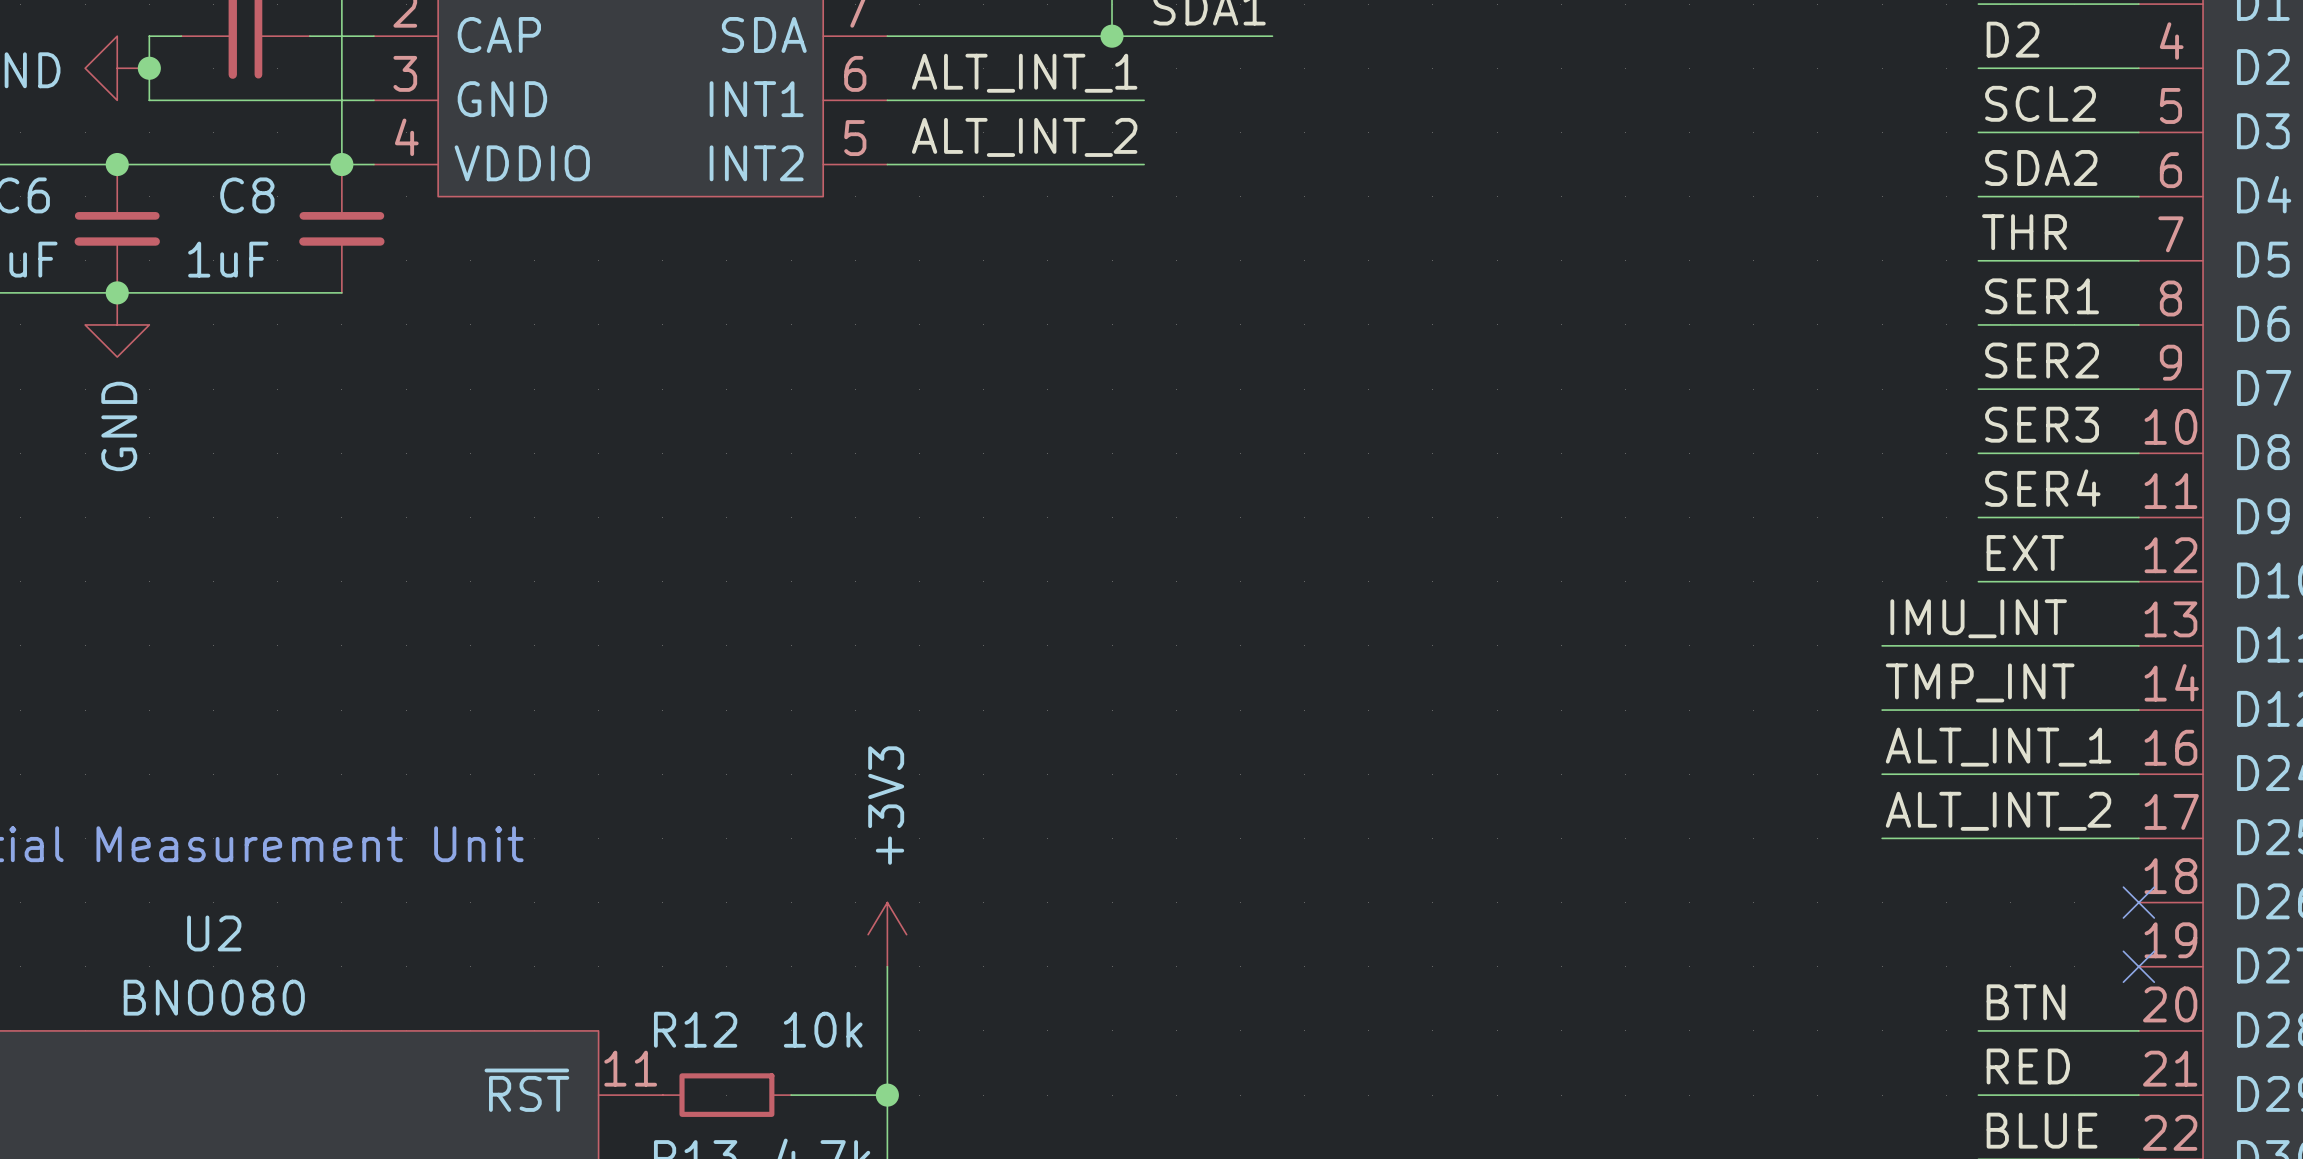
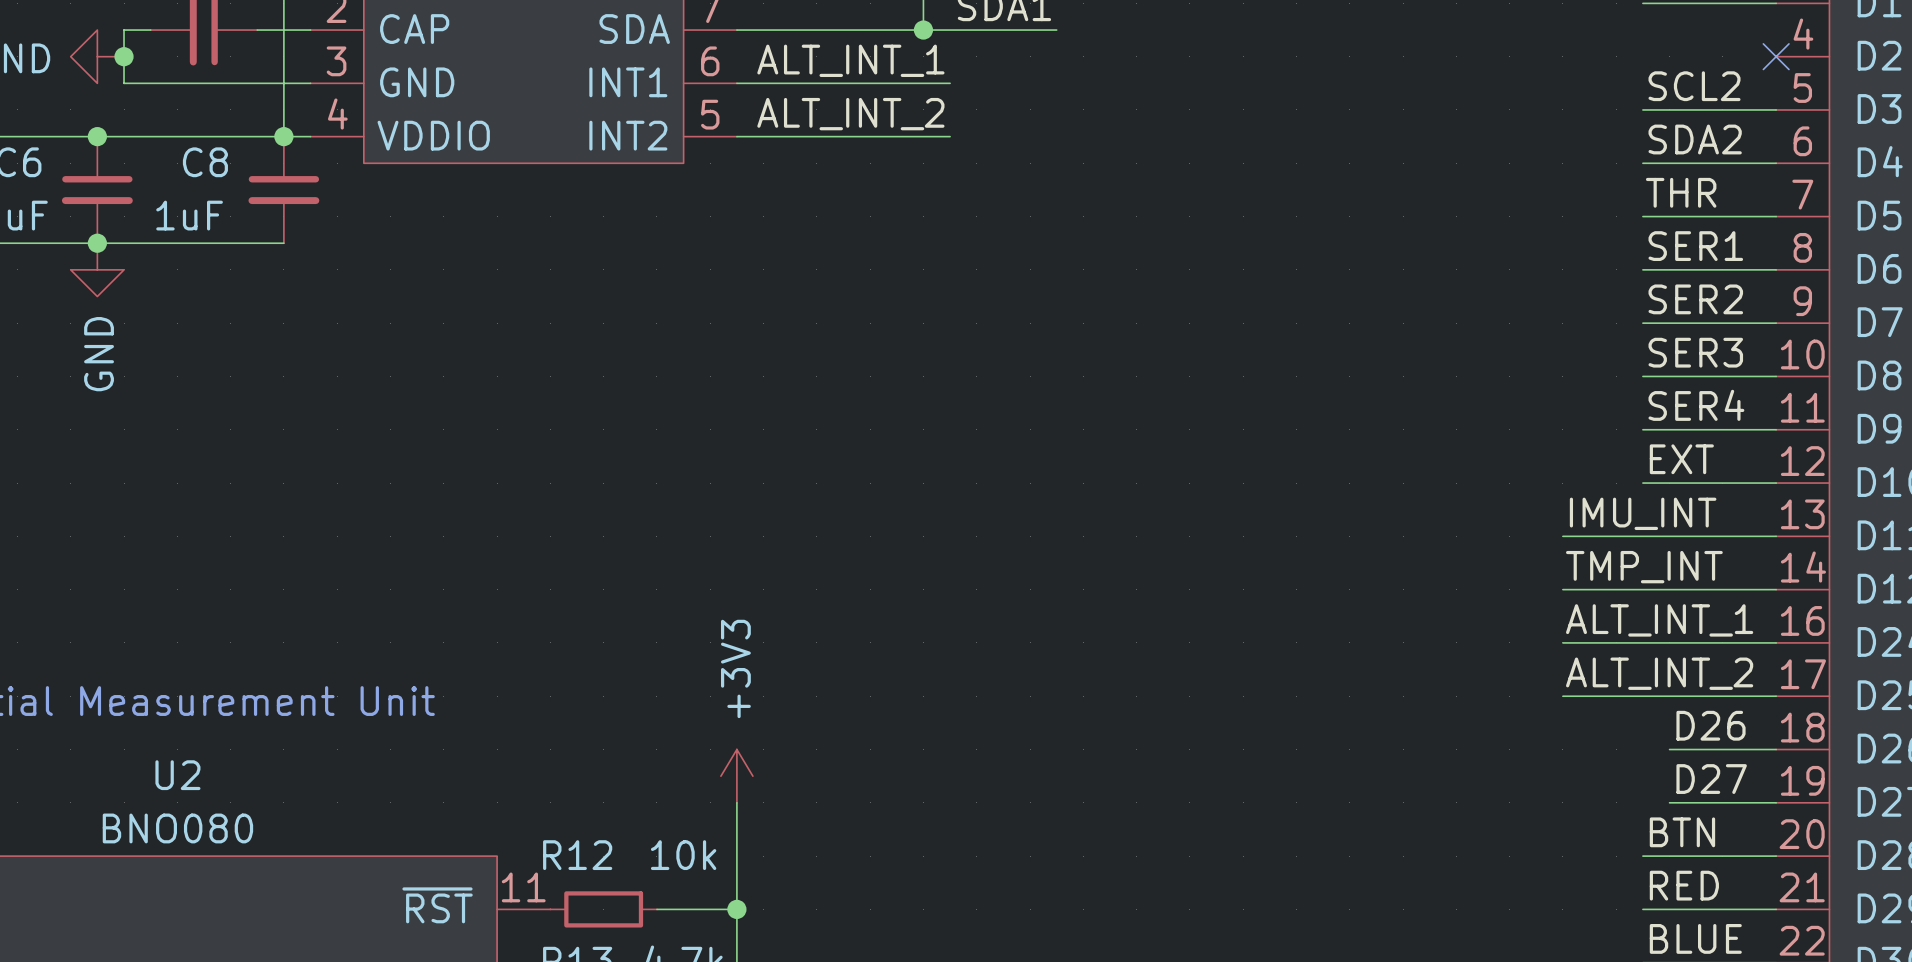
label: D2 (2013, 39) -> none
wire: (1978, 68) (2138, 68) -> none
no-connect mark: none -> (1776, 56)
label: none -> D26 (1711, 725)
wire: none -> (1669, 749) (1776, 749)
no-connect mark: (2138, 902) -> none
label: none -> D27 (1711, 779)
wire: none -> (1669, 802) (1776, 802)
no-connect mark: (2138, 966) -> none

